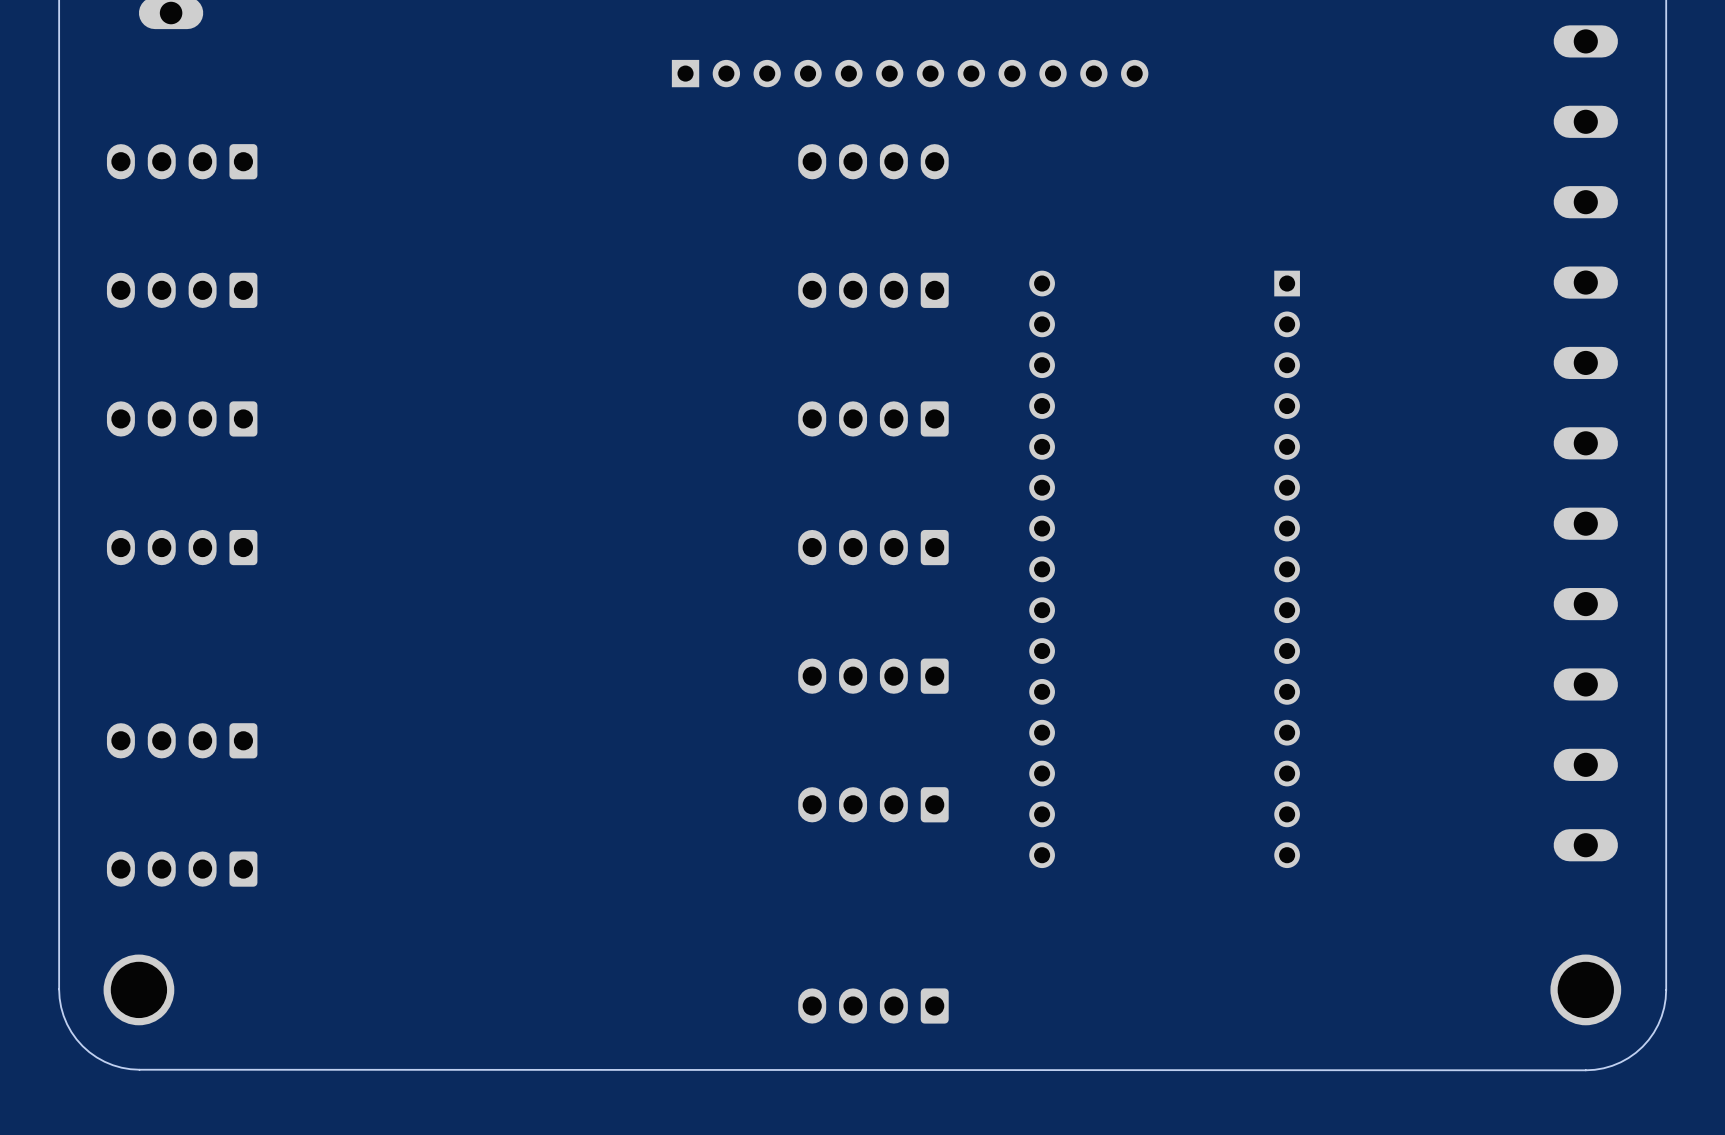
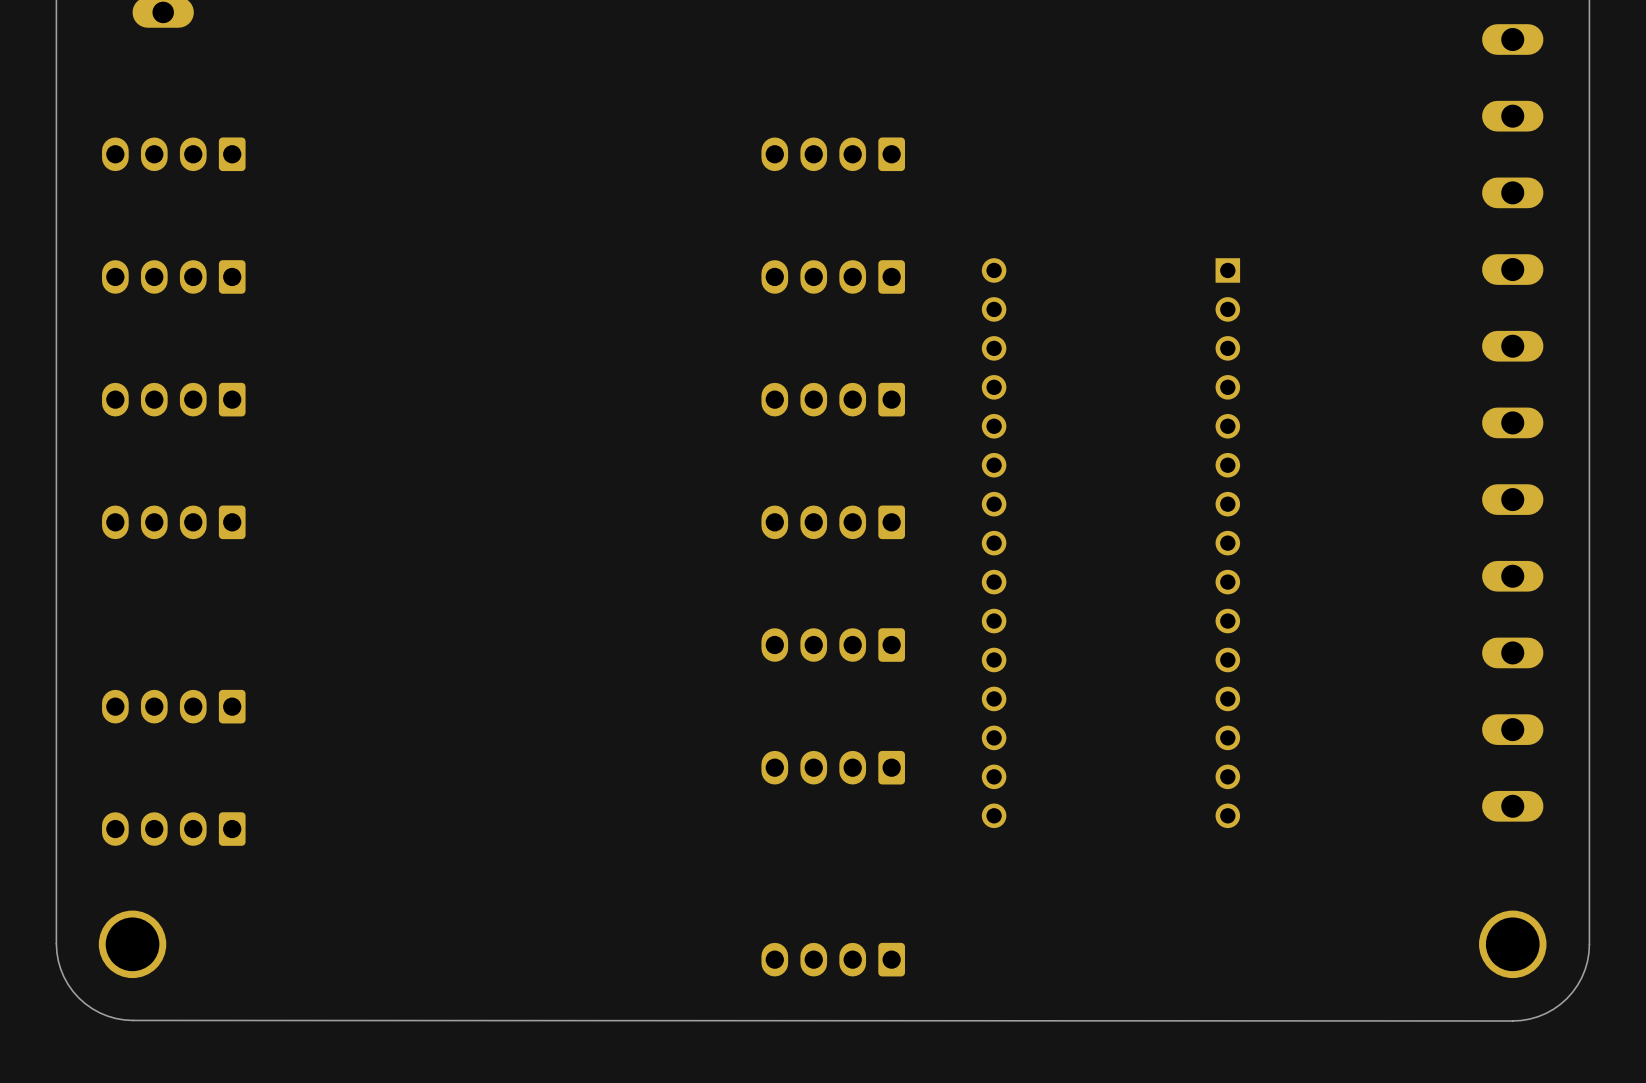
part: (910, 73) -> none
part footprint: [798, 144, 949, 180] -> [761, 137, 905, 172]

